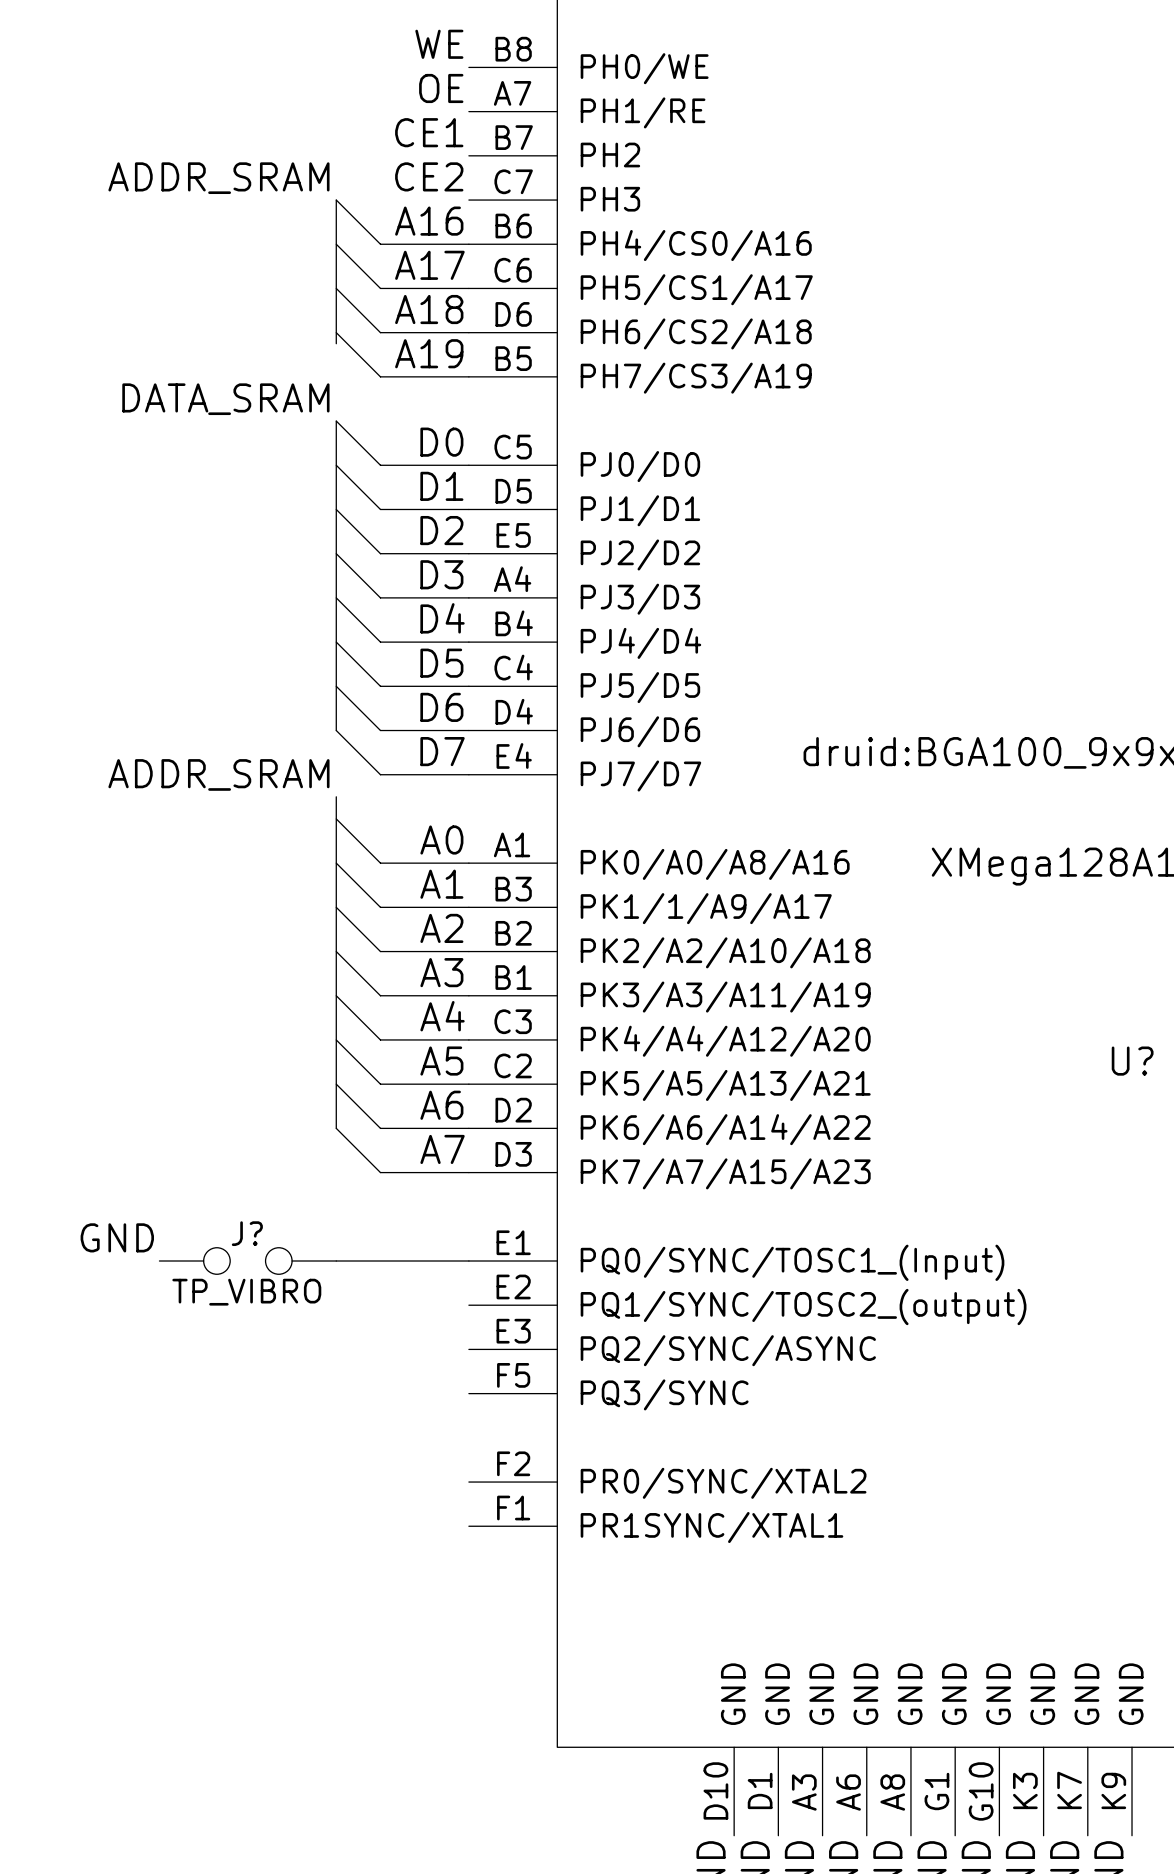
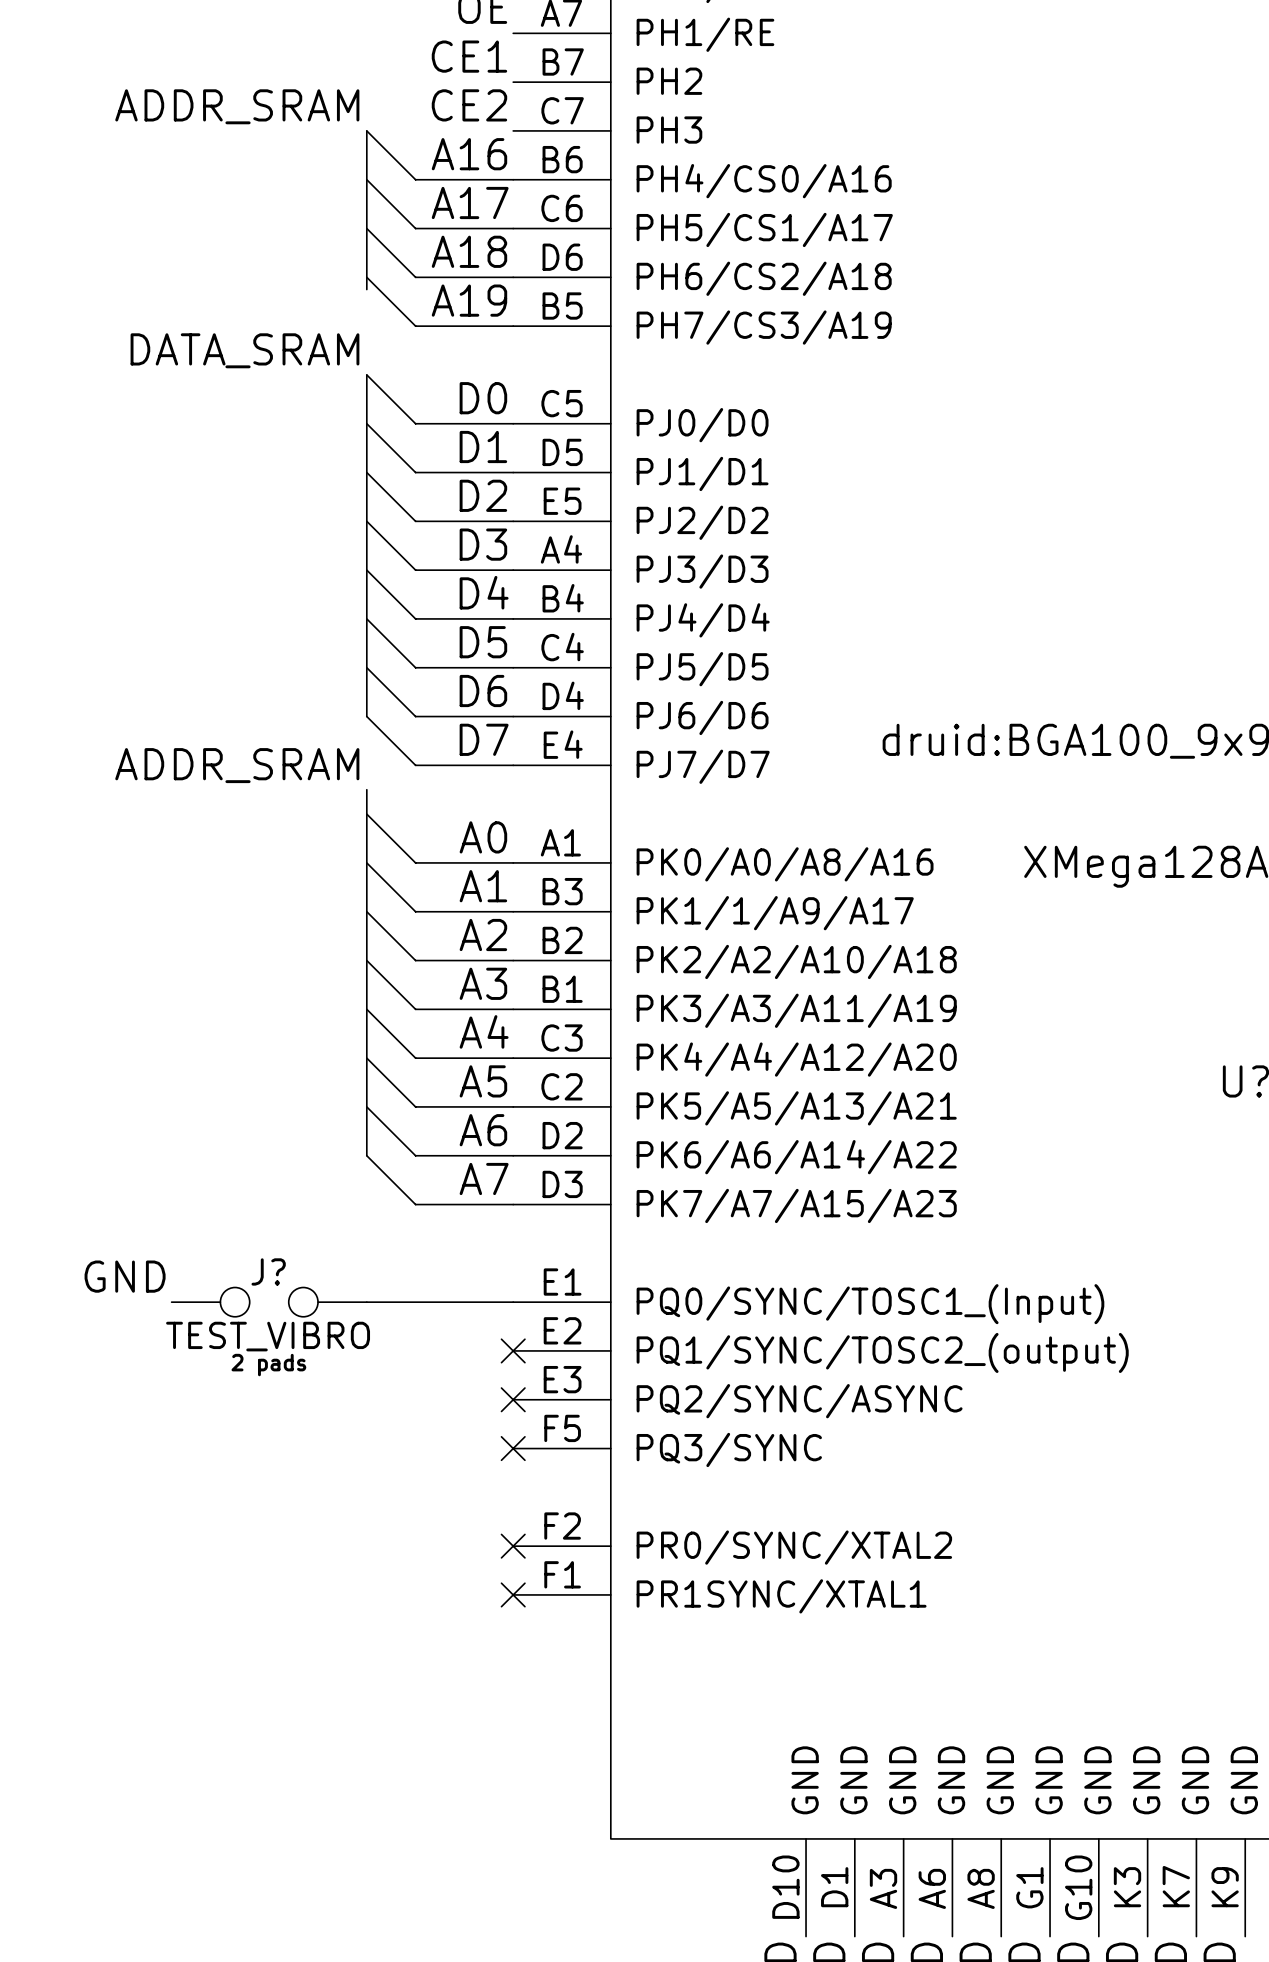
J? value: TP_VIBRO (246, 1292) -> TEST_VIBRO (268, 1336)
no-connect mark: none -> (513, 1350)
J? text: none -> 2 pads (268, 1365)
no-connect mark: none -> (513, 1399)
no-connect mark: none -> (513, 1448)
no-connect mark: none -> (513, 1546)
no-connect mark: none -> (513, 1594)

